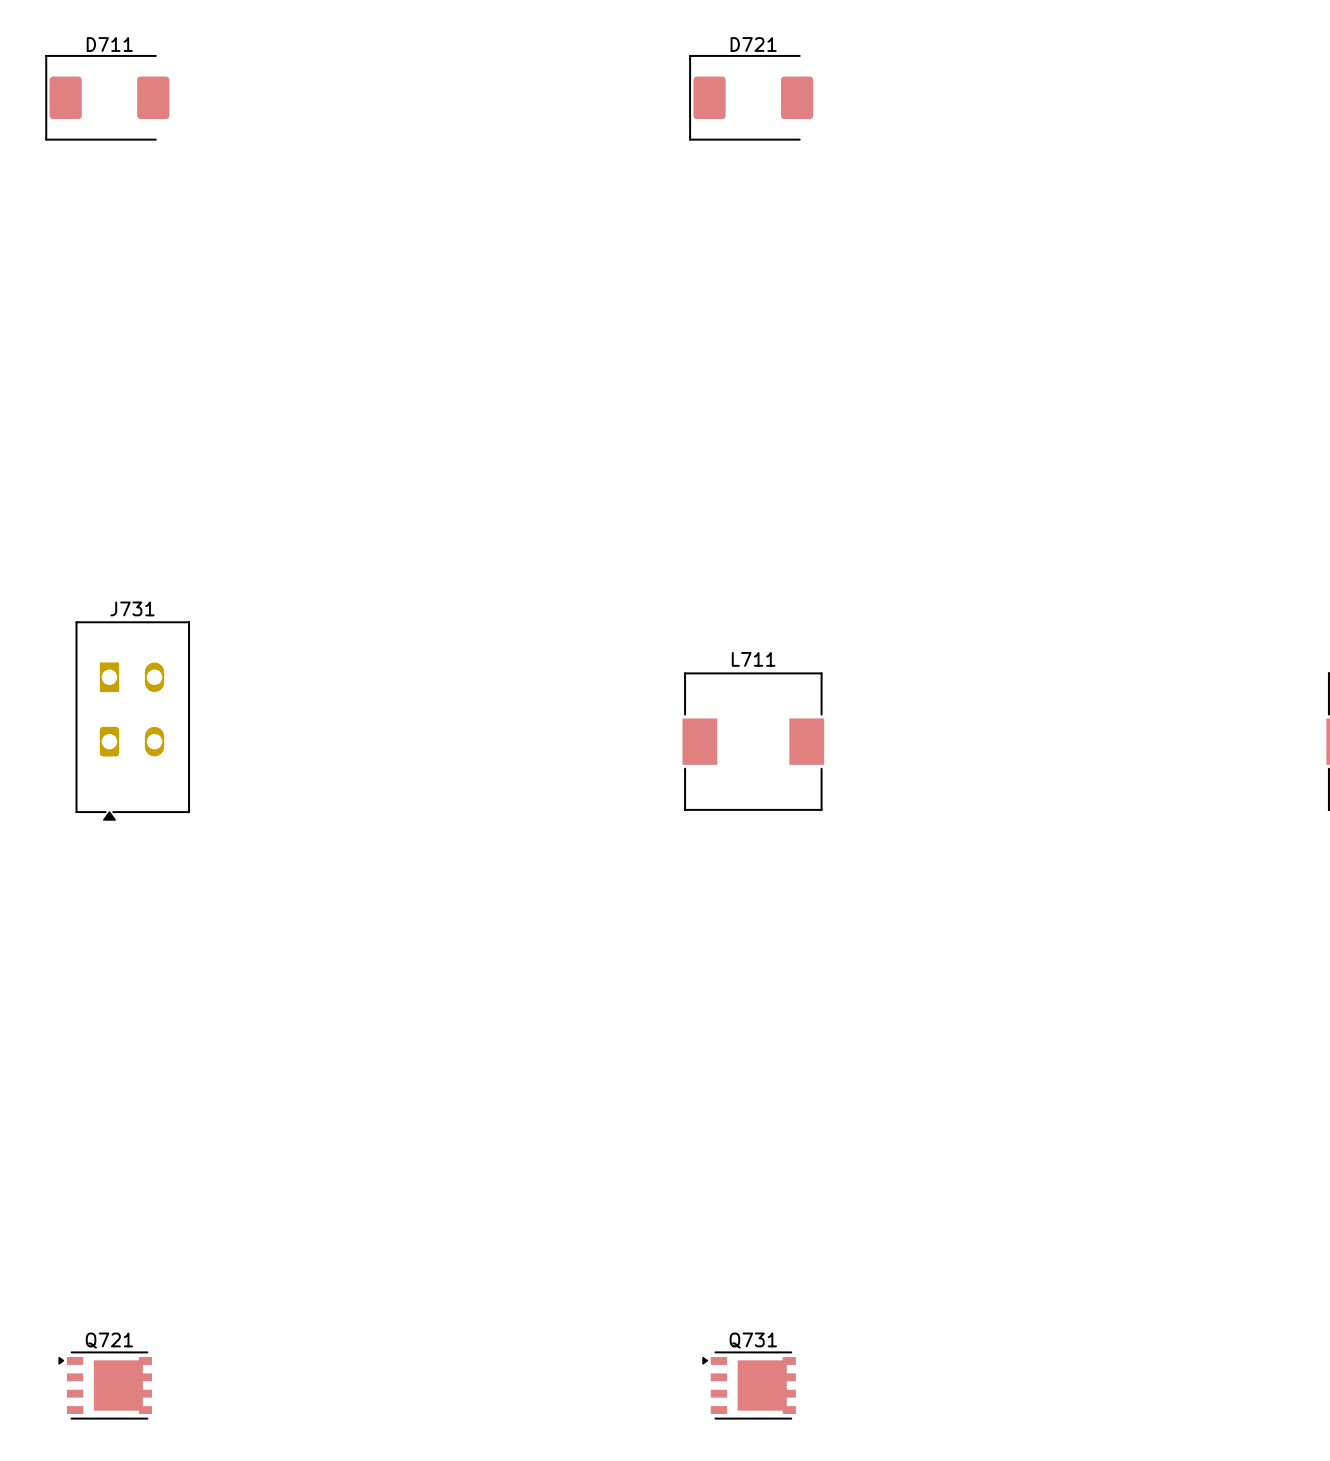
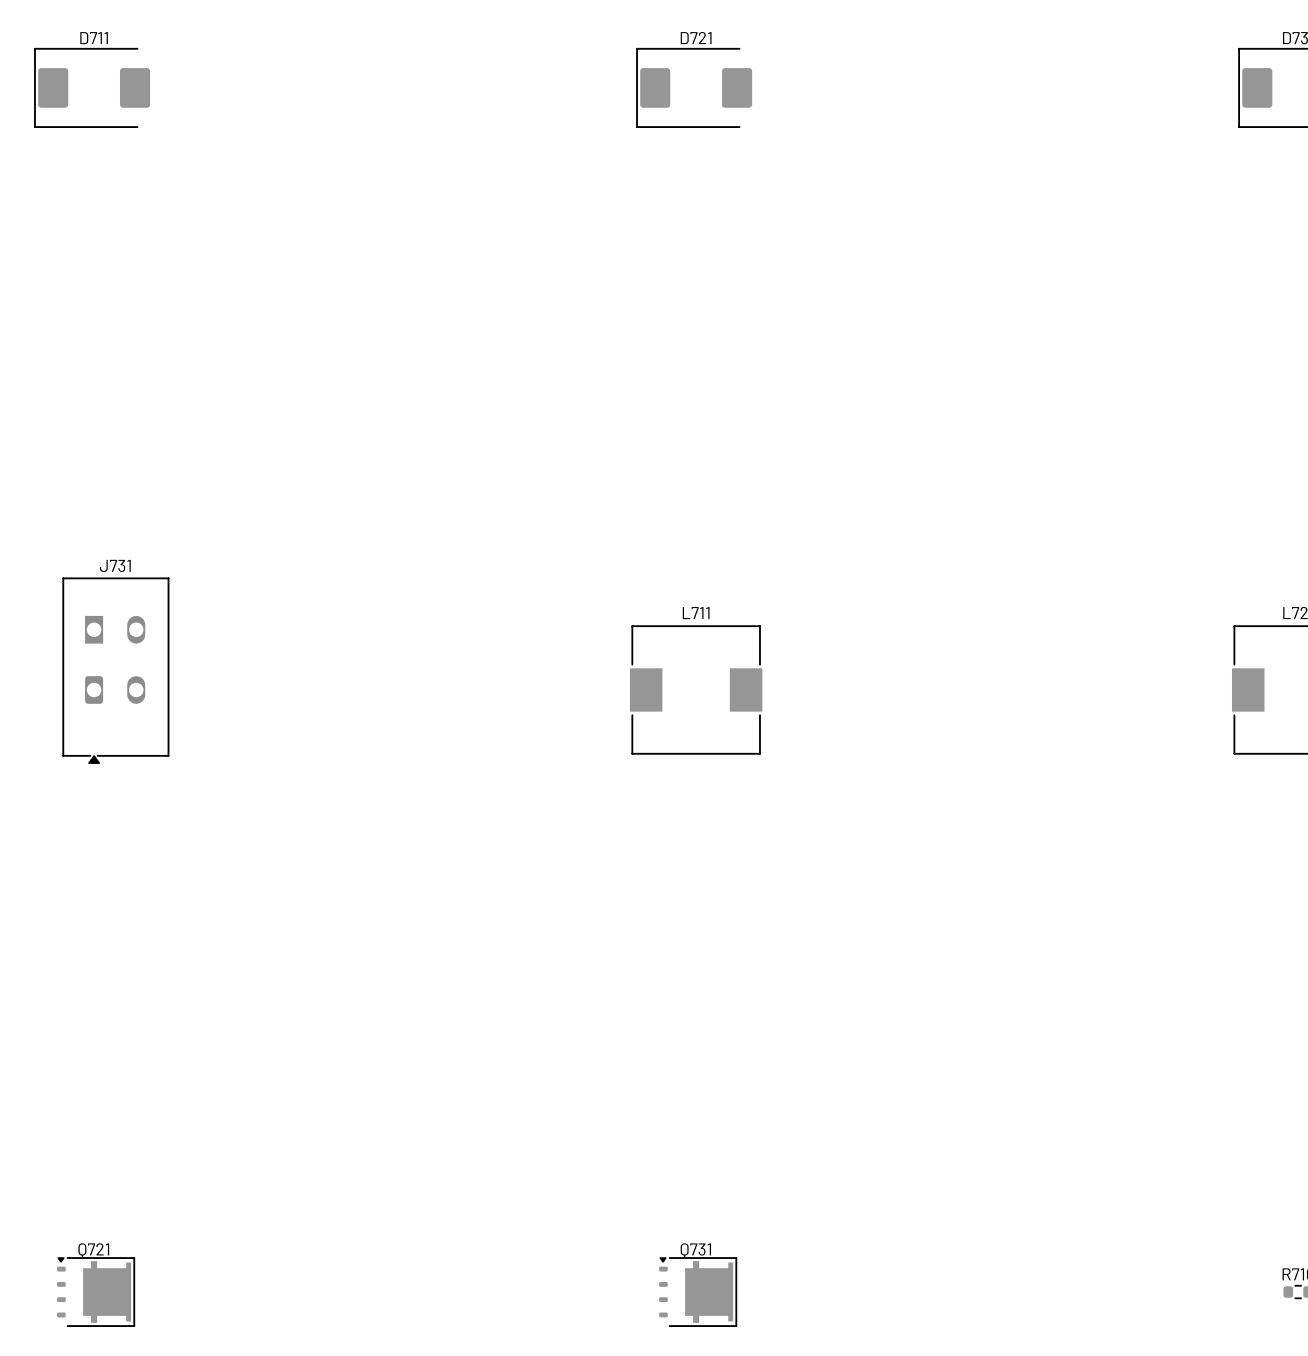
Q721 footprint: [58, 1351, 153, 1420] -> [57, 1257, 135, 1327]
Q731 footprint: [702, 1351, 796, 1420] -> [659, 1257, 738, 1327]

